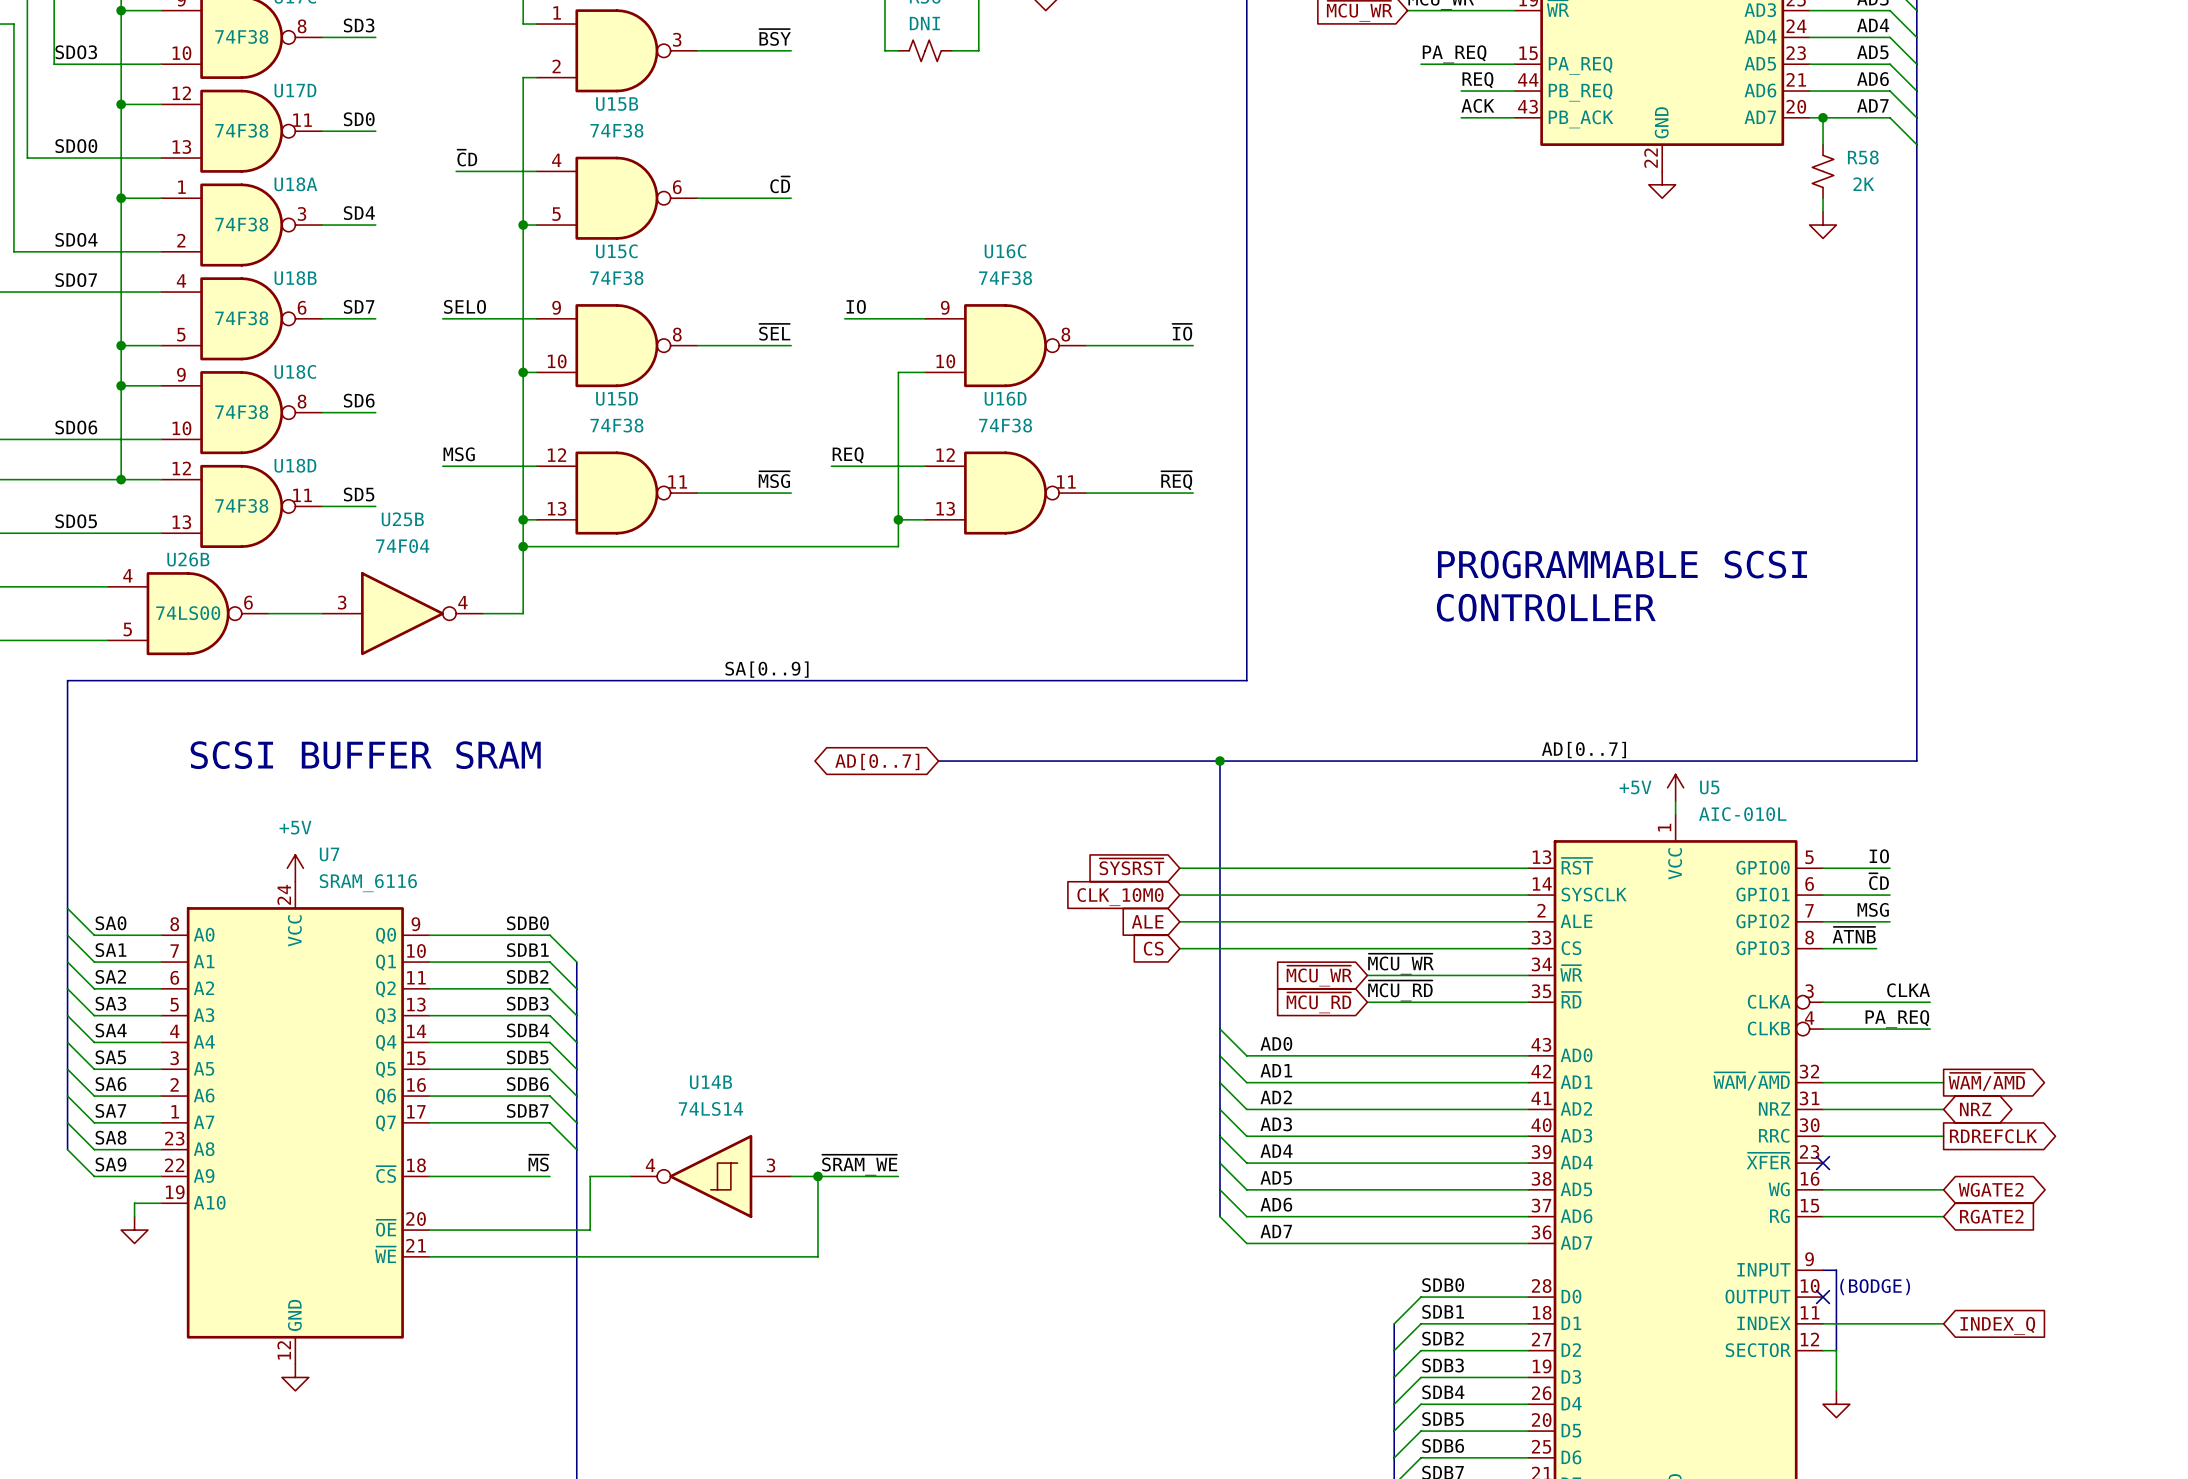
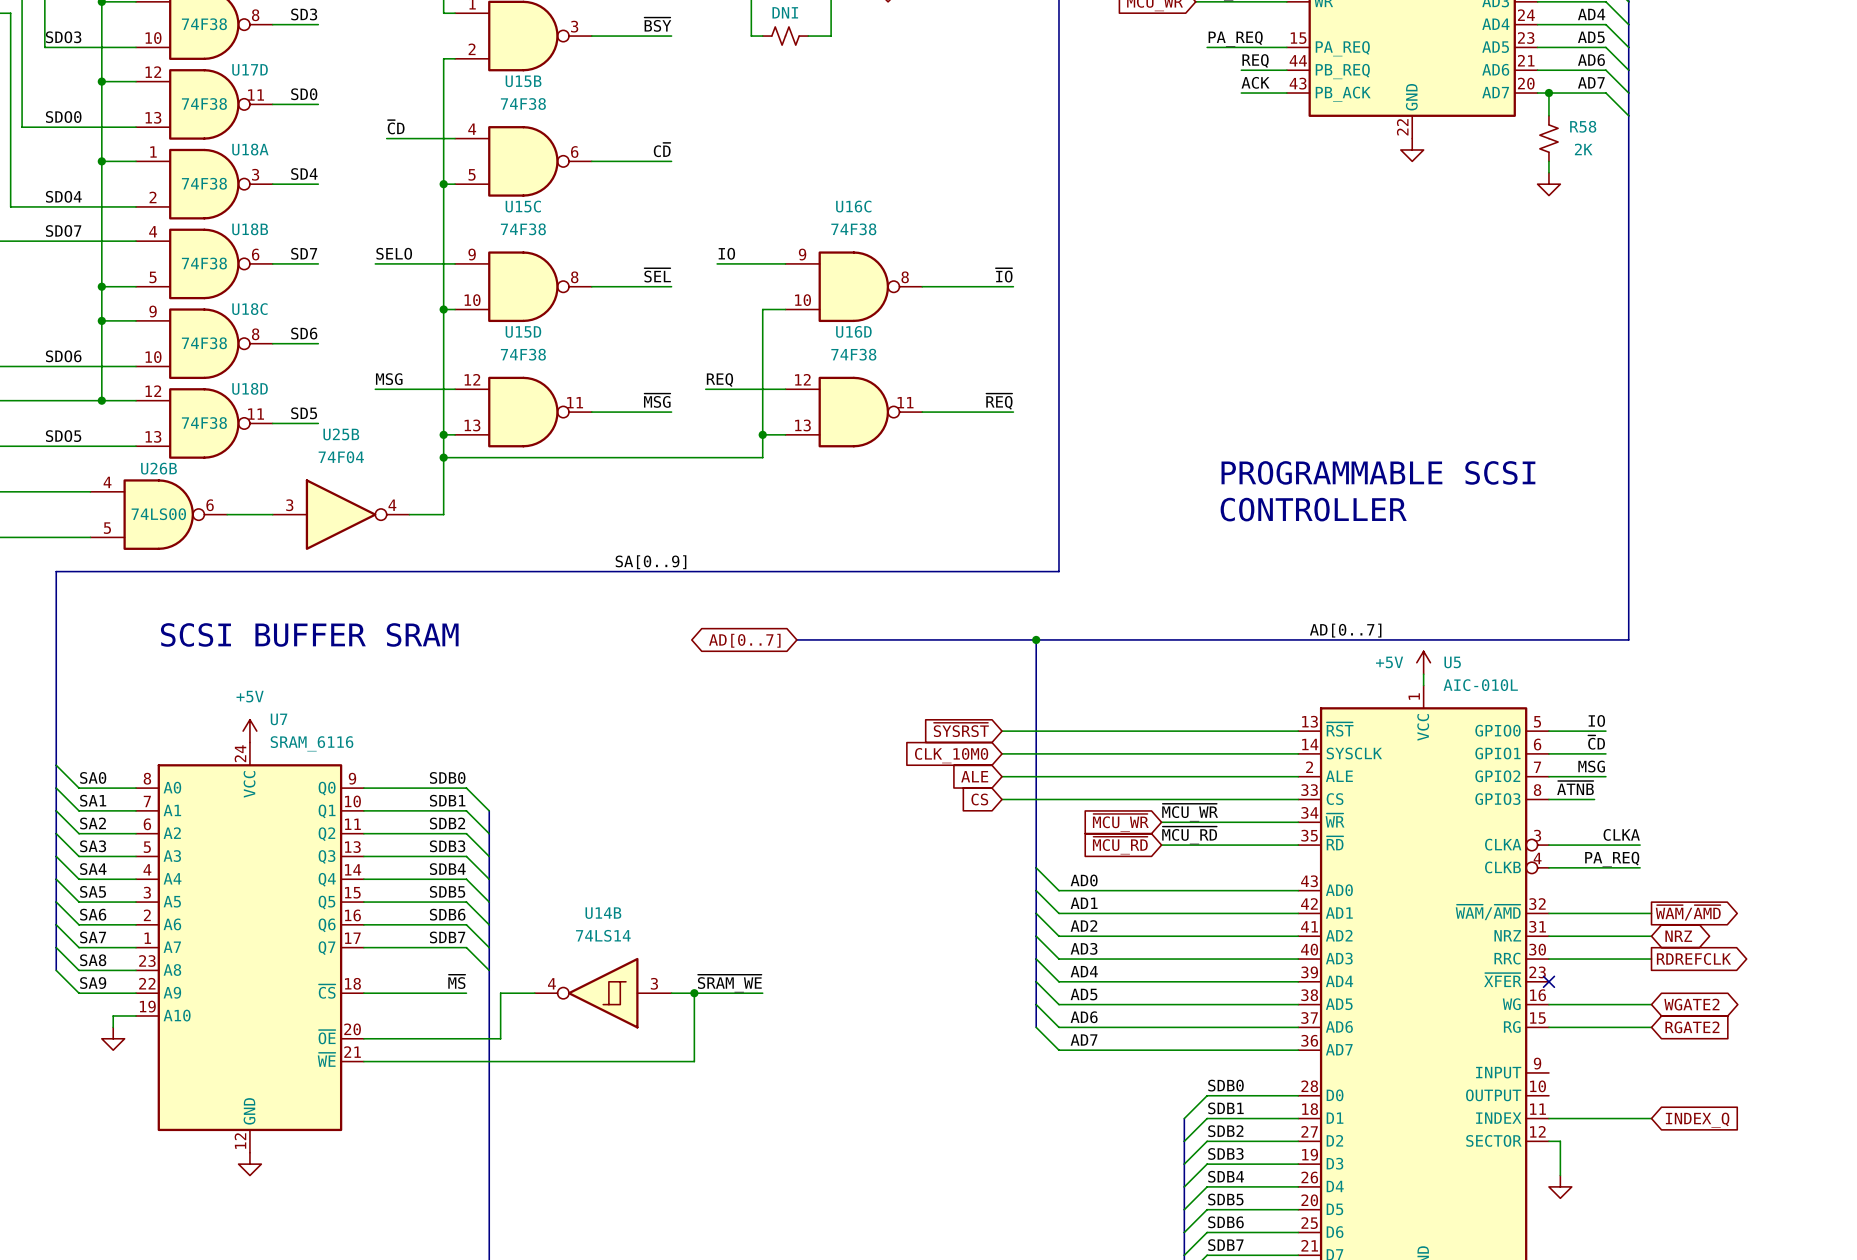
line: (1823, 1270) (1836, 1270) (1836, 1350) -> none
text: (BODGE) (1875, 1287) -> none
no-connect mark: (1823, 1297) -> none

